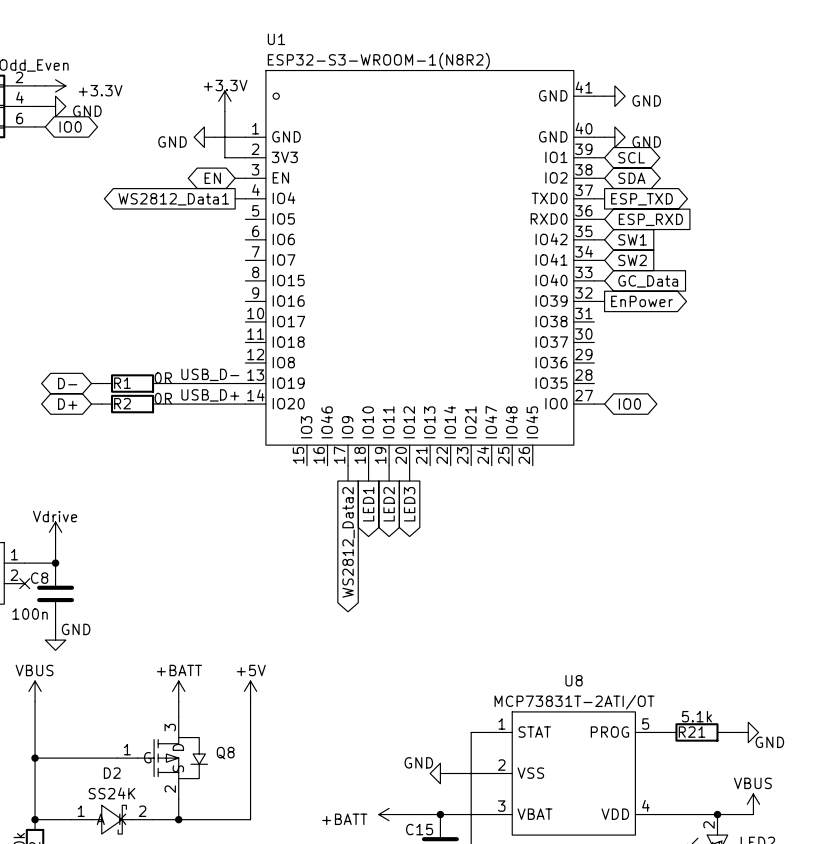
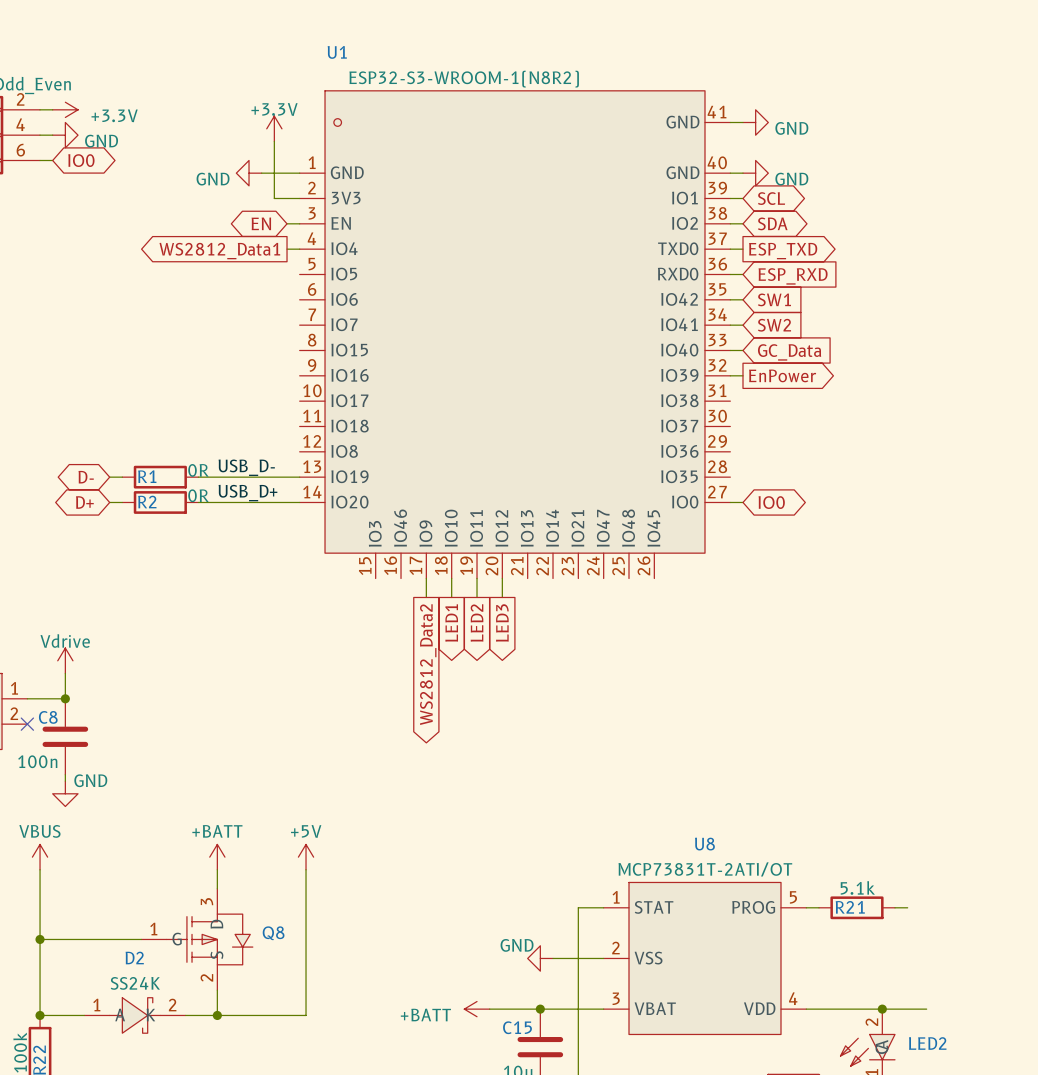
power symbol: GND (748, 732) -> none
power symbol: VBUS (753, 804) -> none

